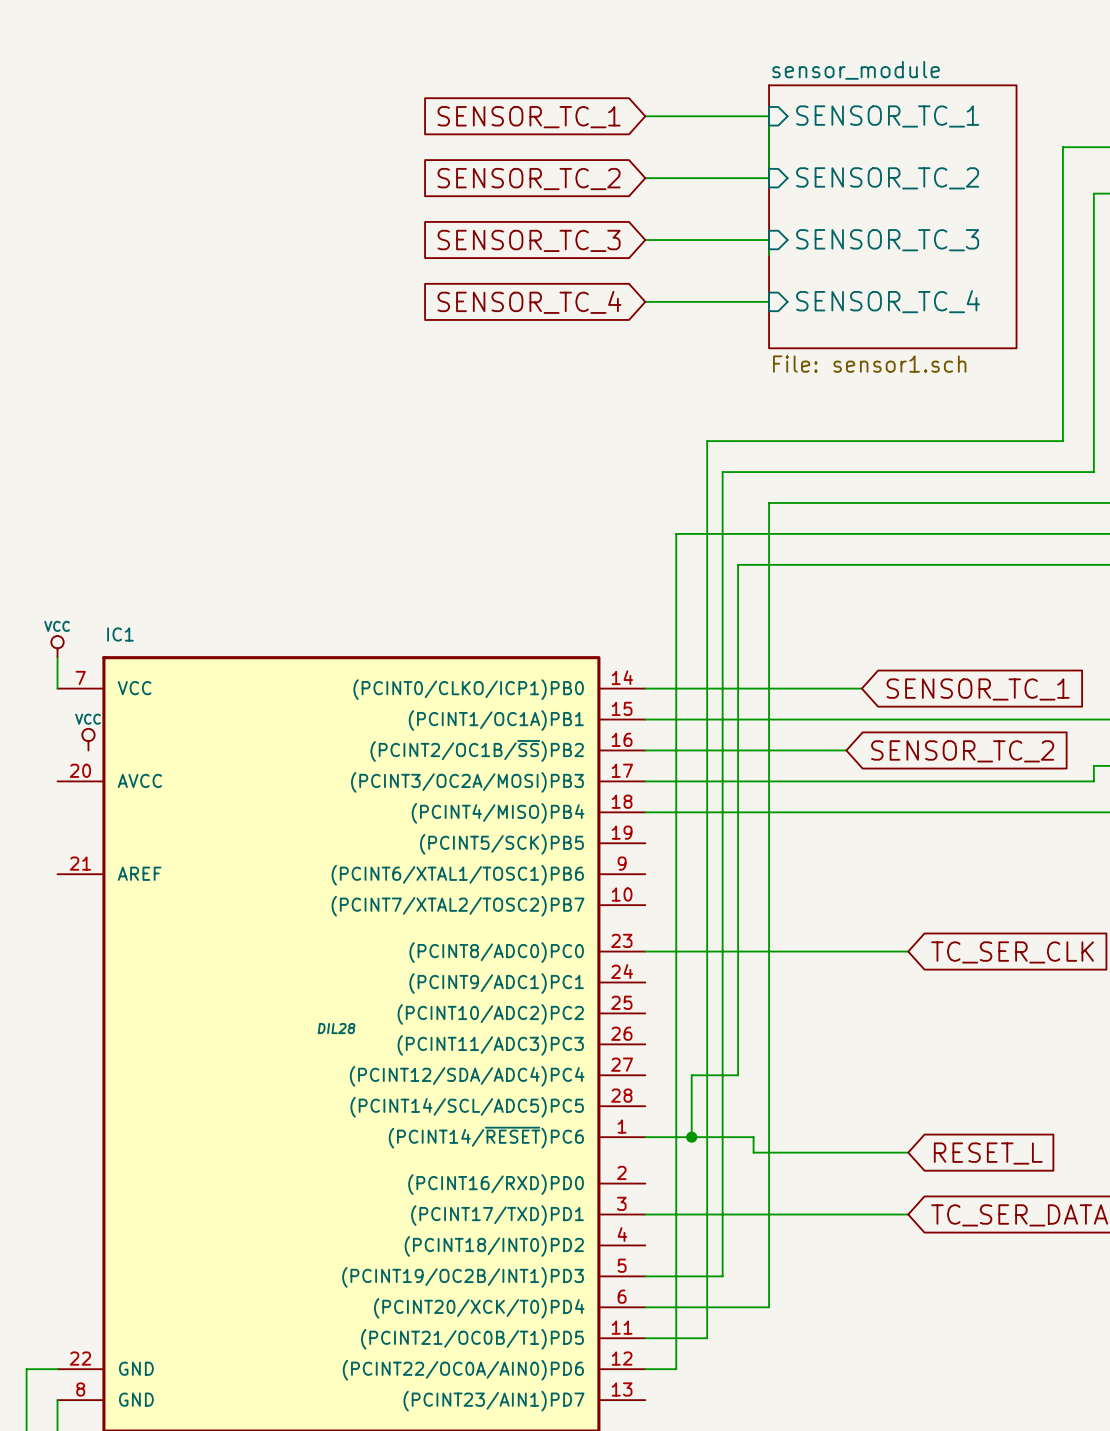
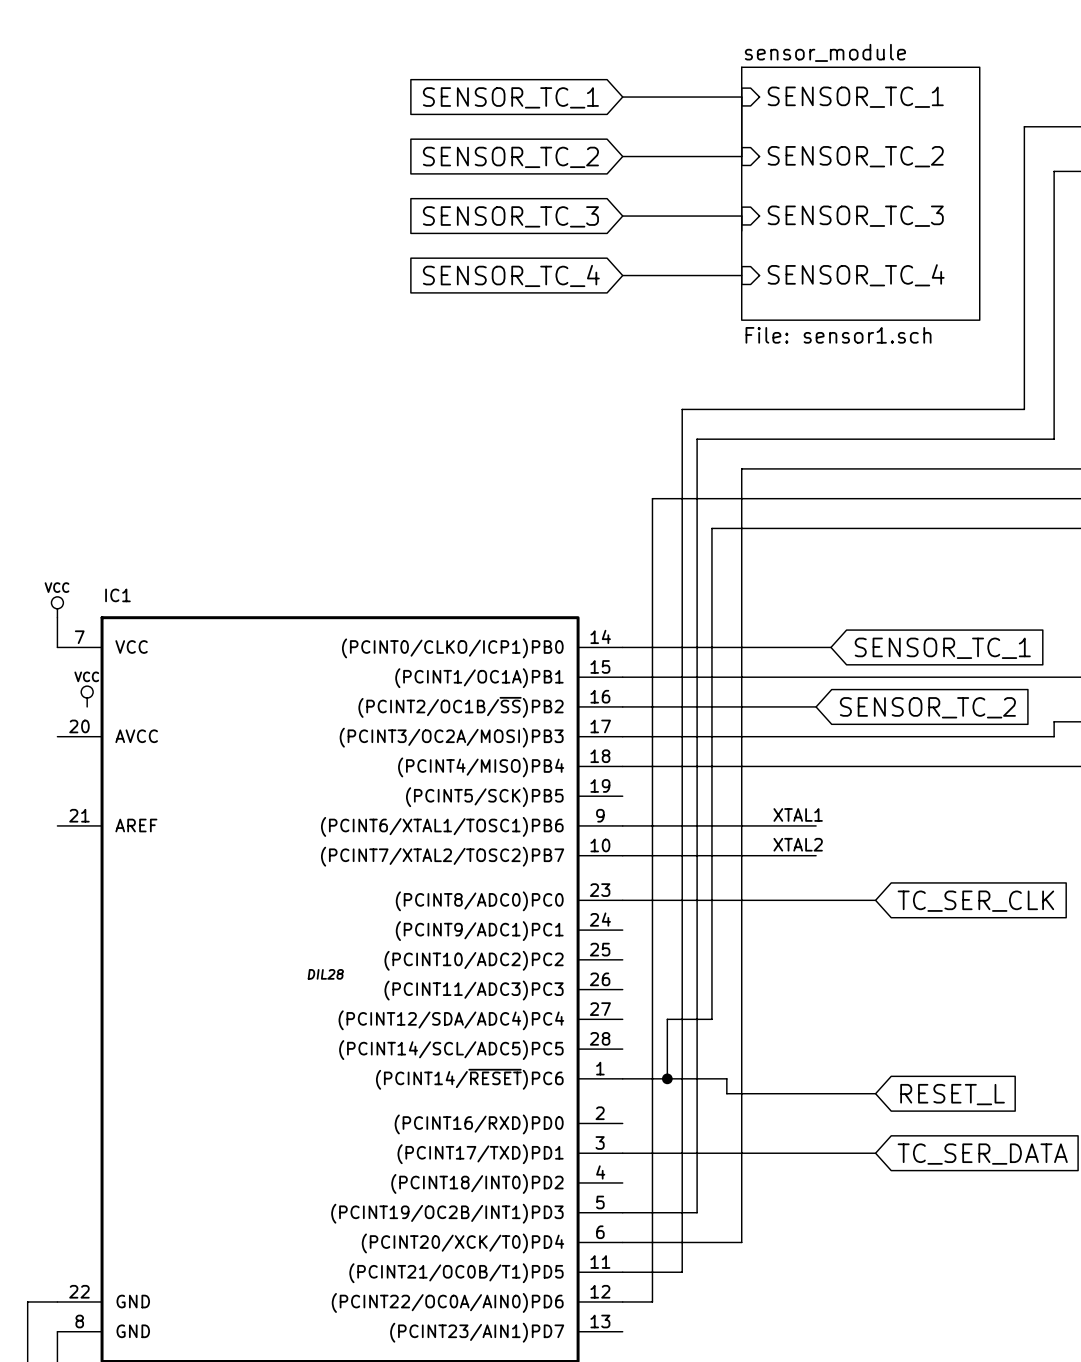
label: none -> XTAL1 (798, 814)
wire: none -> (622, 825) (816, 825)
label: none -> XTAL2 (798, 844)
wire: none -> (622, 855) (816, 855)

